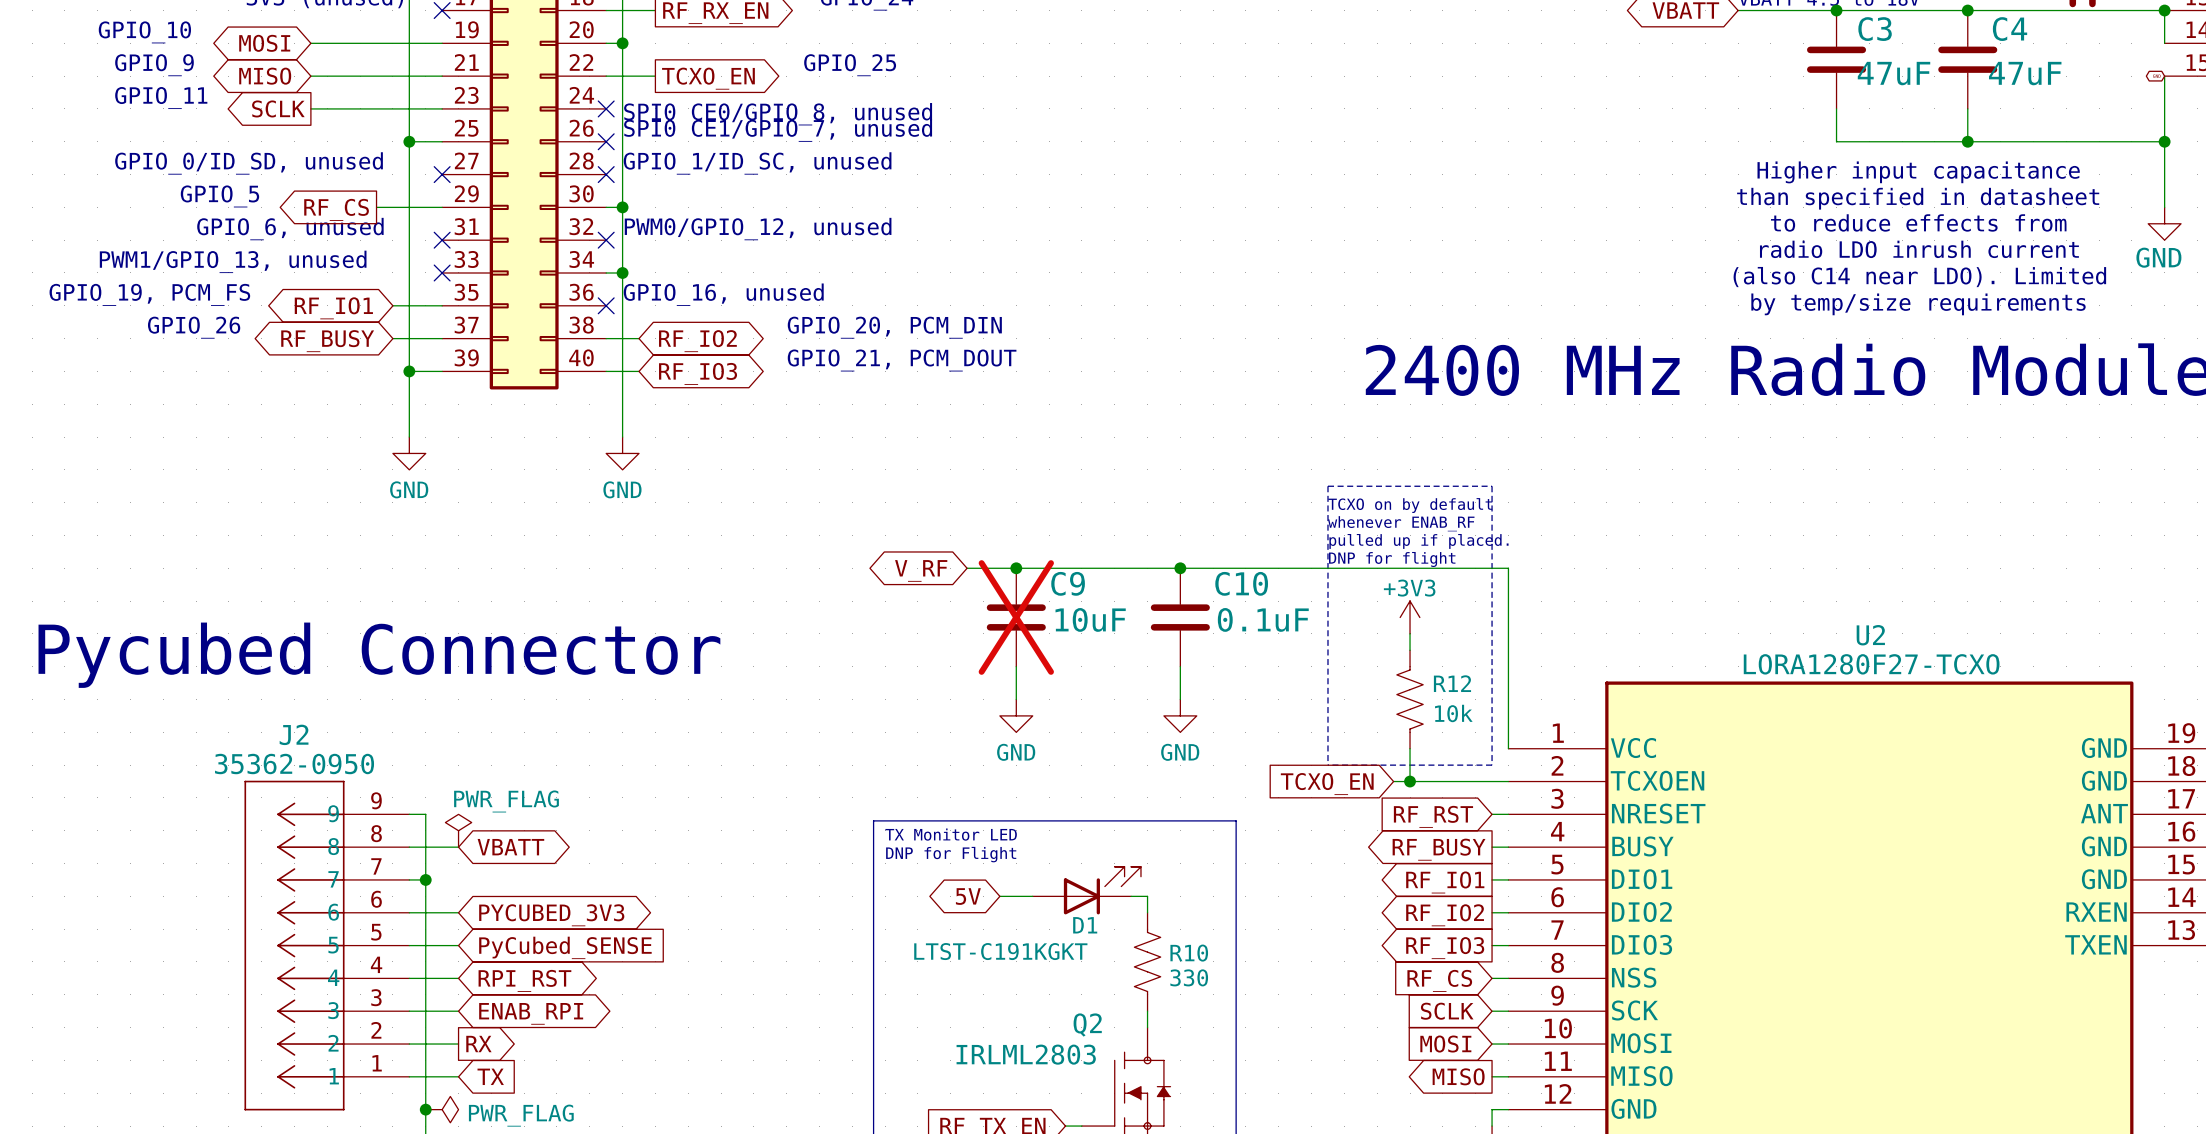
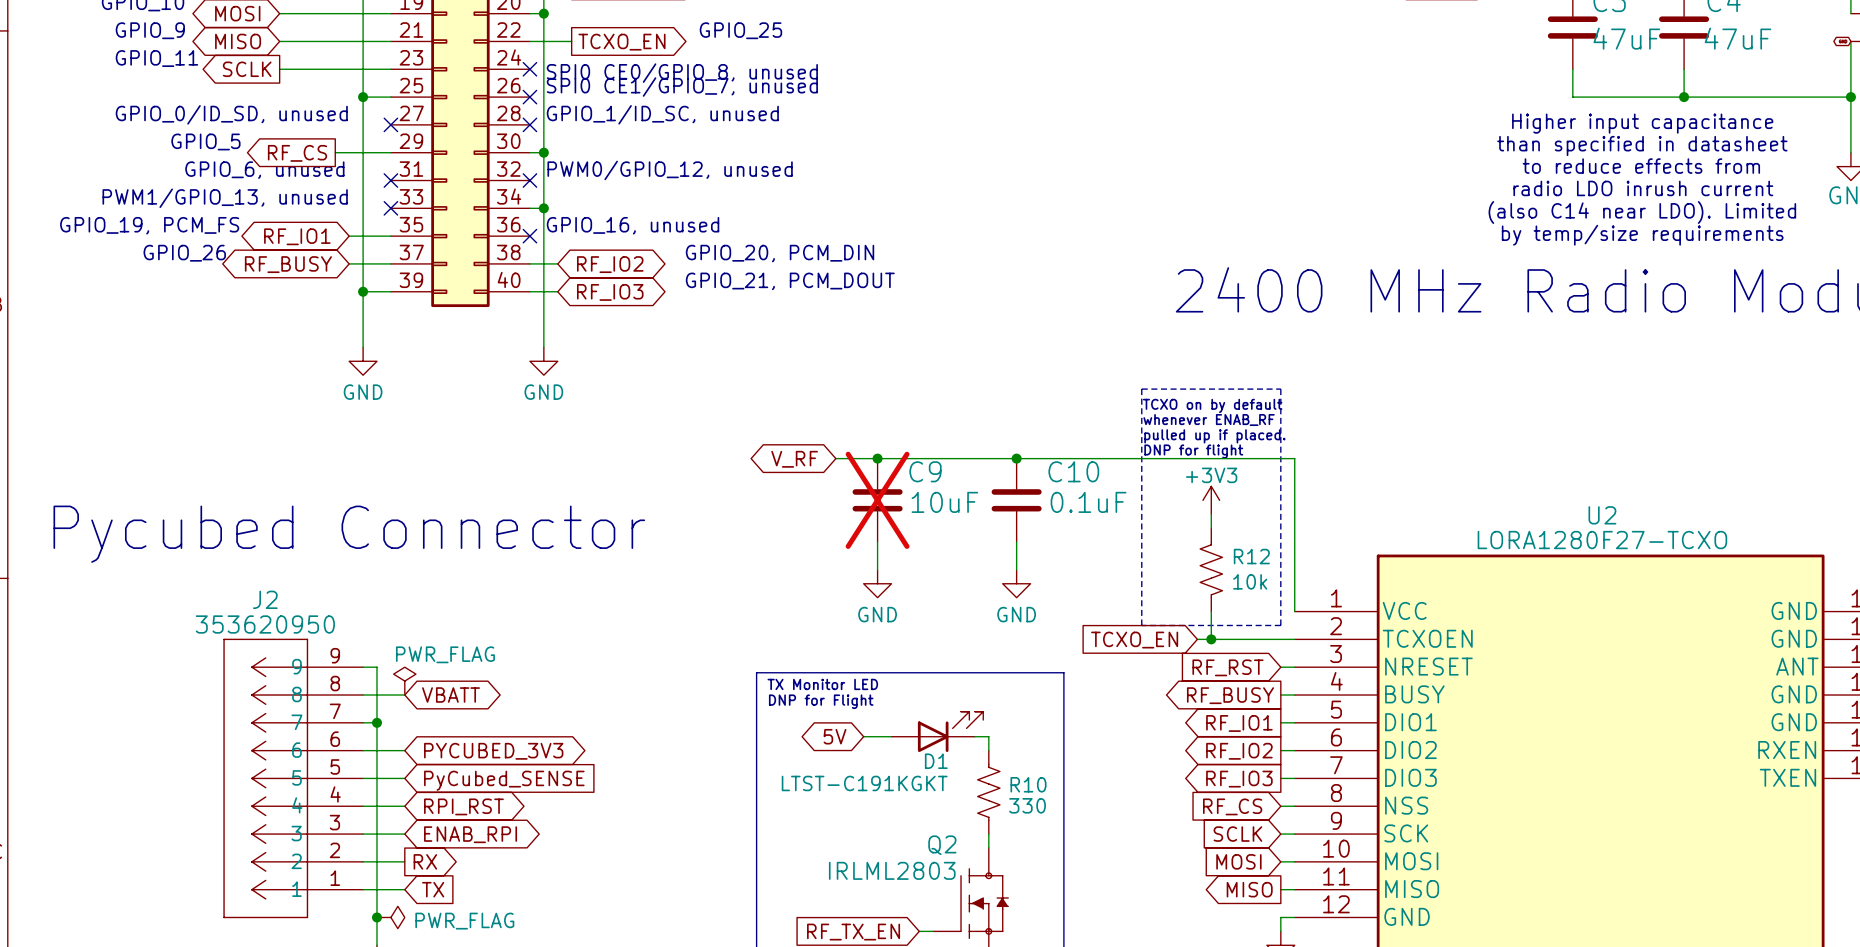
J2 value: 35362-0950 (294, 764) -> 353620950 (265, 624)

